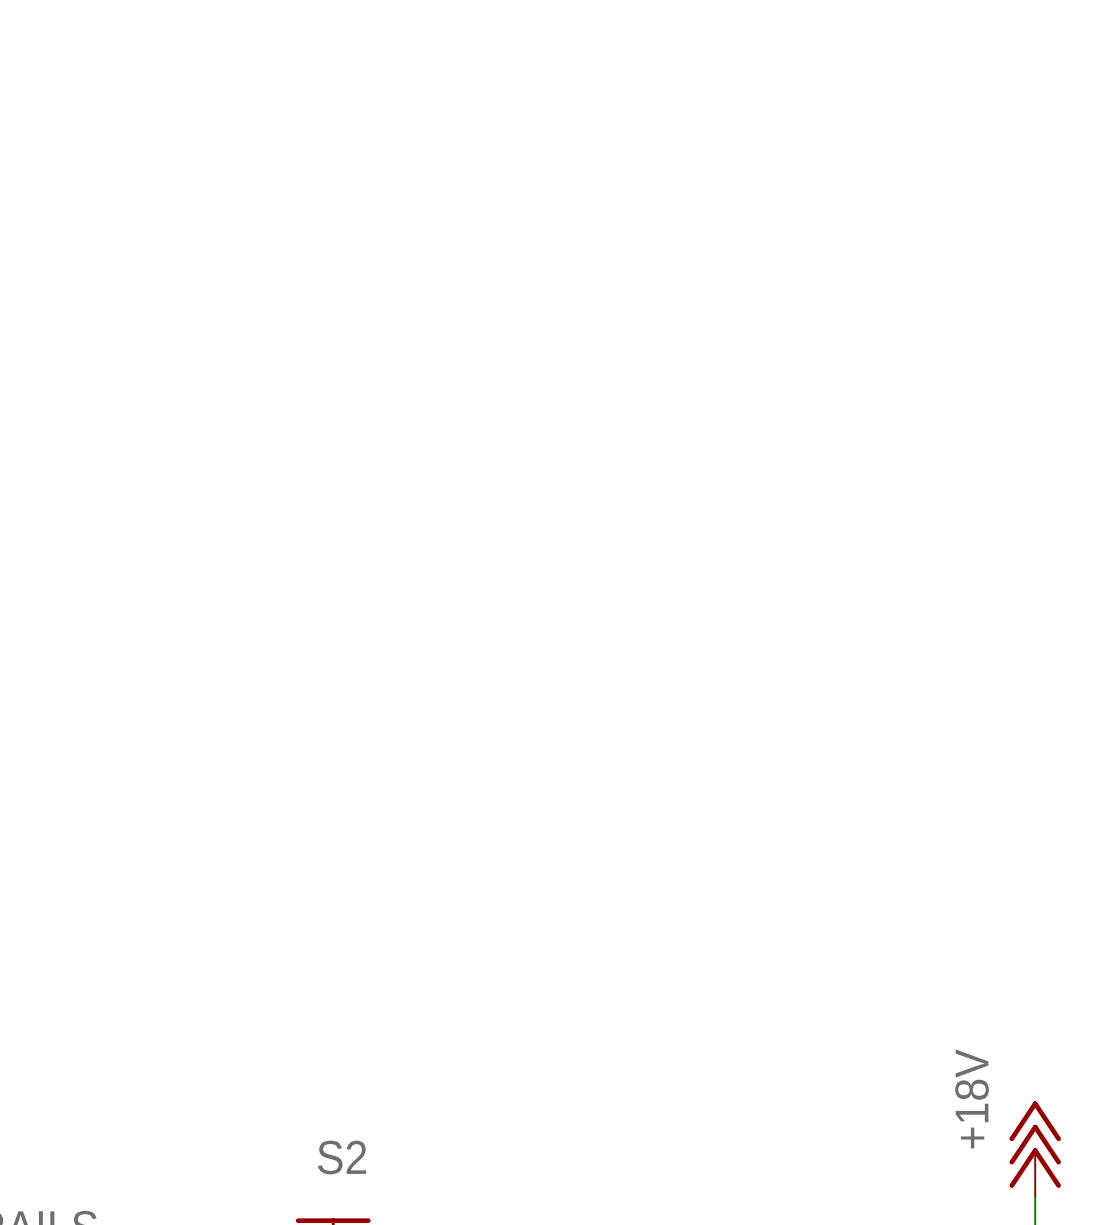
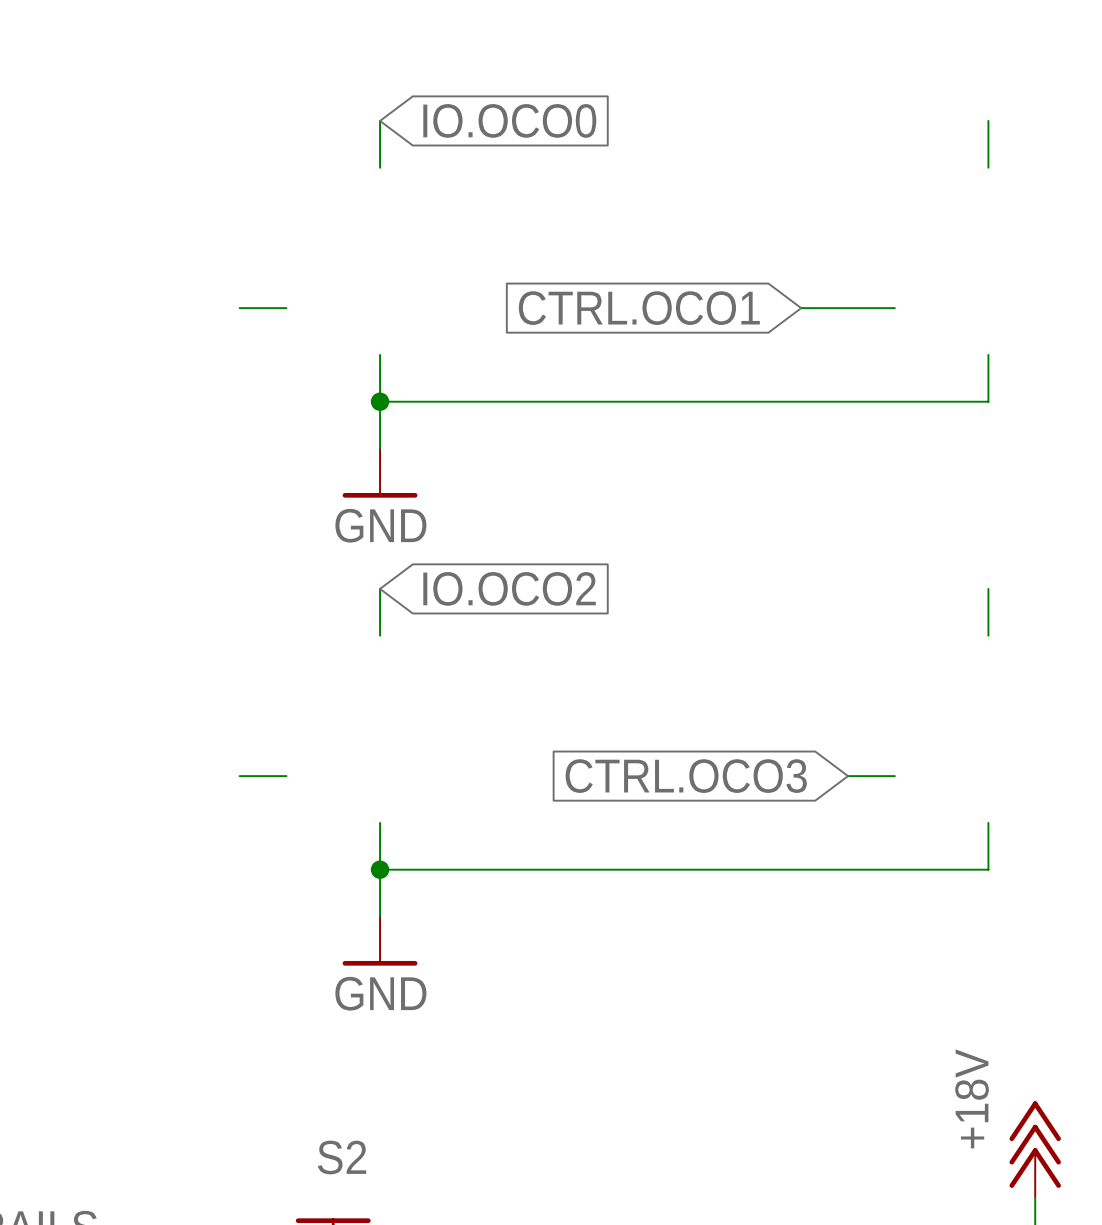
wire: none -> (380, 120) (380, 167)
global label: none -> IO.OCO0 (509, 120)
wire: none -> (988, 120) (988, 167)
wire: none -> (239, 308) (286, 308)
global label: none -> CTRL.OCO1 (639, 308)
wire: none -> (801, 308) (894, 308)
wire: none -> (380, 354) (380, 448)
wire: none -> (988, 354) (988, 401) (380, 401)
junction: none -> (380, 401)
power symbol: none -> GND (380, 473)
wire: none -> (380, 588) (380, 635)
global label: none -> IO.OCO2 (509, 588)
wire: none -> (988, 588) (988, 635)
wire: none -> (239, 776) (286, 776)
global label: none -> CTRL.OCO3 (686, 776)
wire: none -> (848, 776) (894, 776)
wire: none -> (380, 822) (380, 916)
wire: none -> (988, 822) (988, 869) (380, 869)
junction: none -> (380, 869)
power symbol: none -> GND (380, 941)

